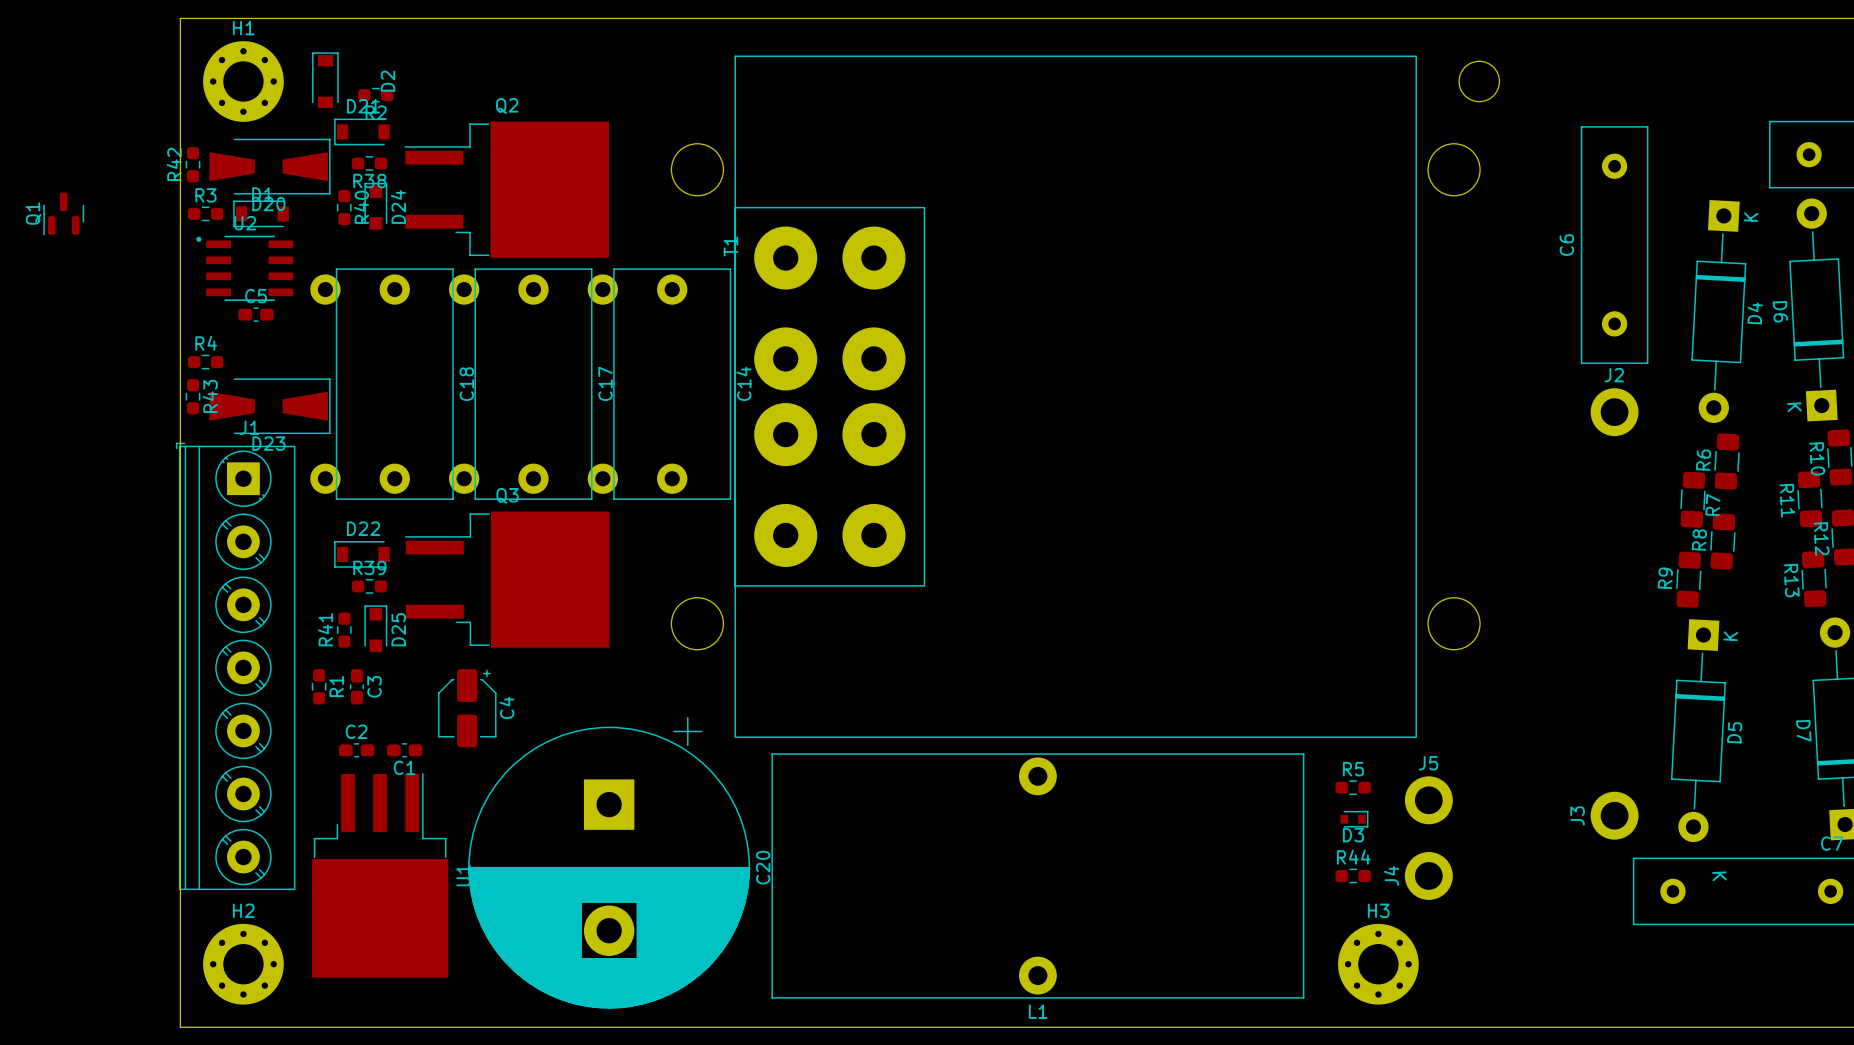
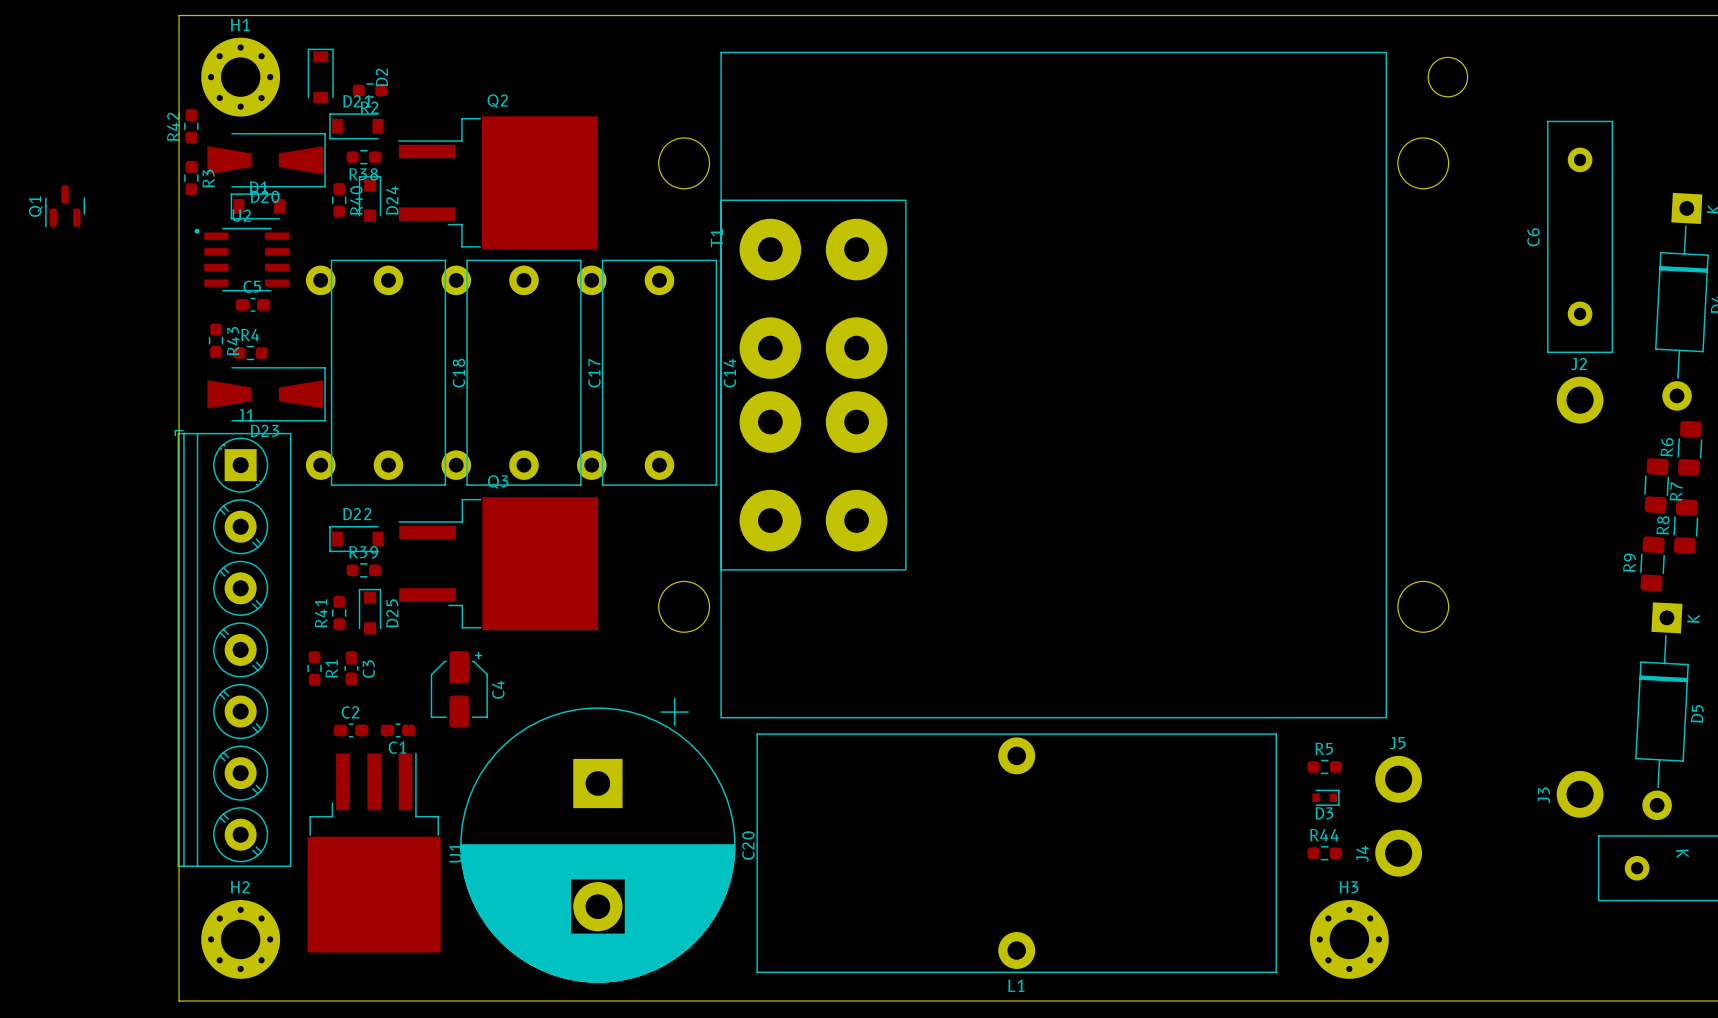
R42 position: (193, 164) -> (191, 126)
R3 rotation: 0° (205, 213) -> 90° clockwise (191, 178)
R3 position: (205, 213) -> (191, 178)
R4 position: (205, 362) -> (250, 353)
R43 position: (193, 396) -> (216, 340)

